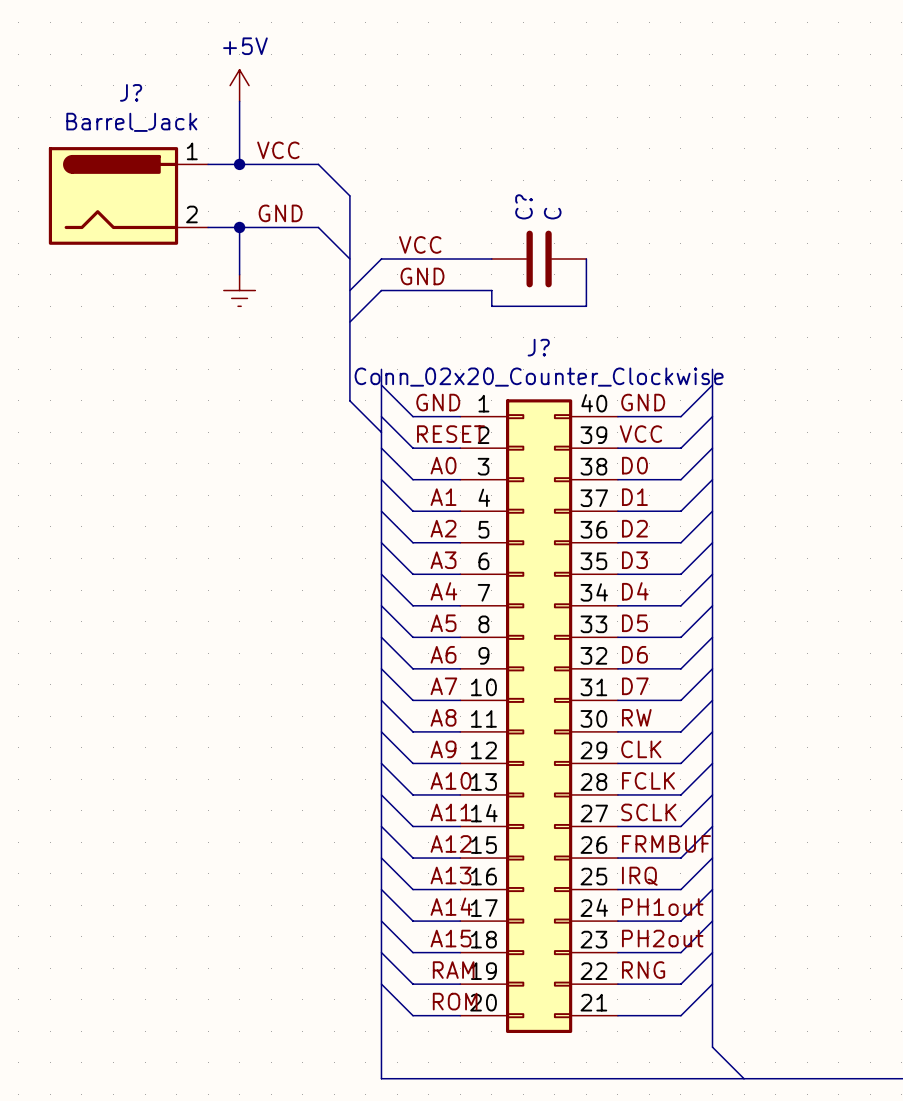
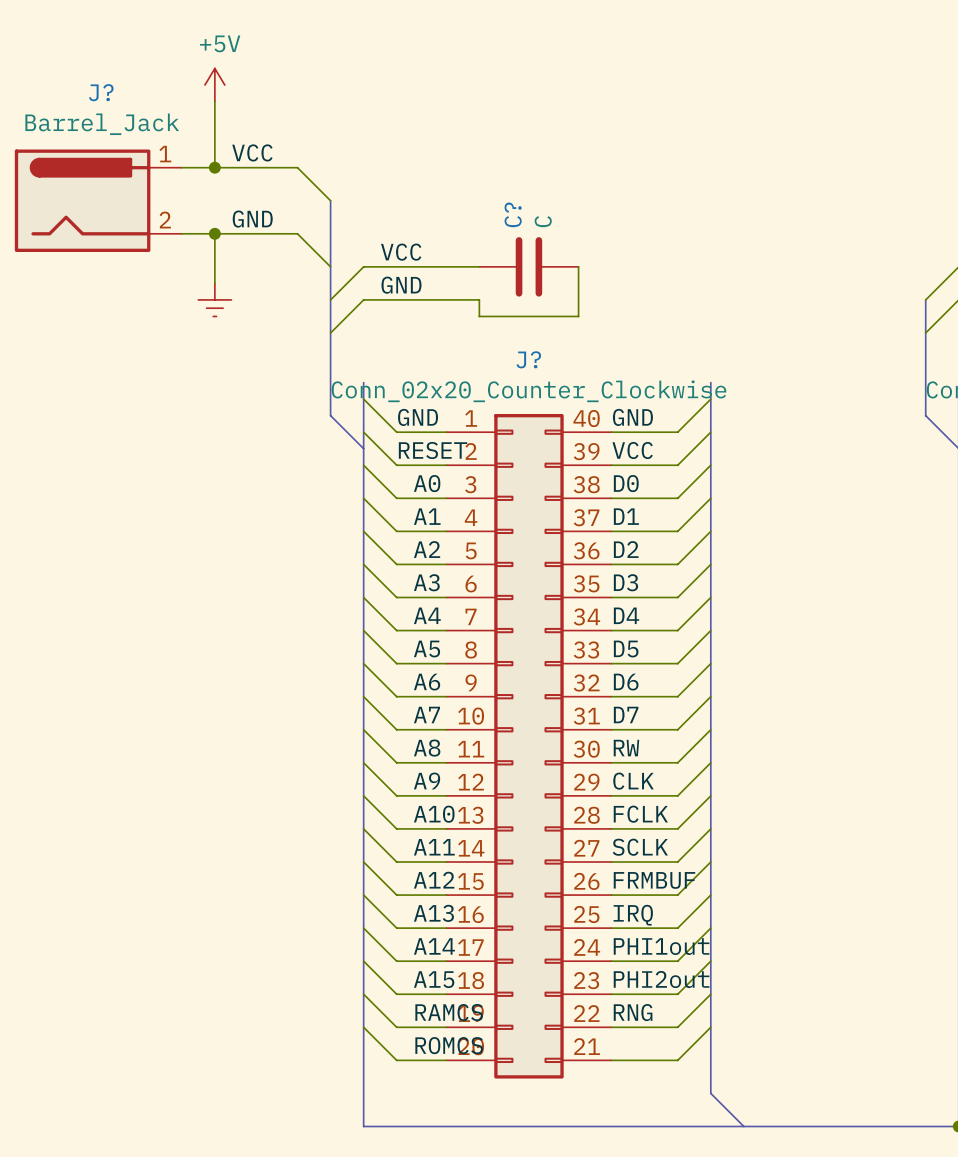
label: PH1out (662, 907) -> PHI1out (661, 946)
label: PH2out (662, 938) -> PHI2out (661, 979)
label: RAM (453, 970) -> RAMCS (449, 1012)
label: ROM (455, 1001) -> ROMCS (449, 1045)

